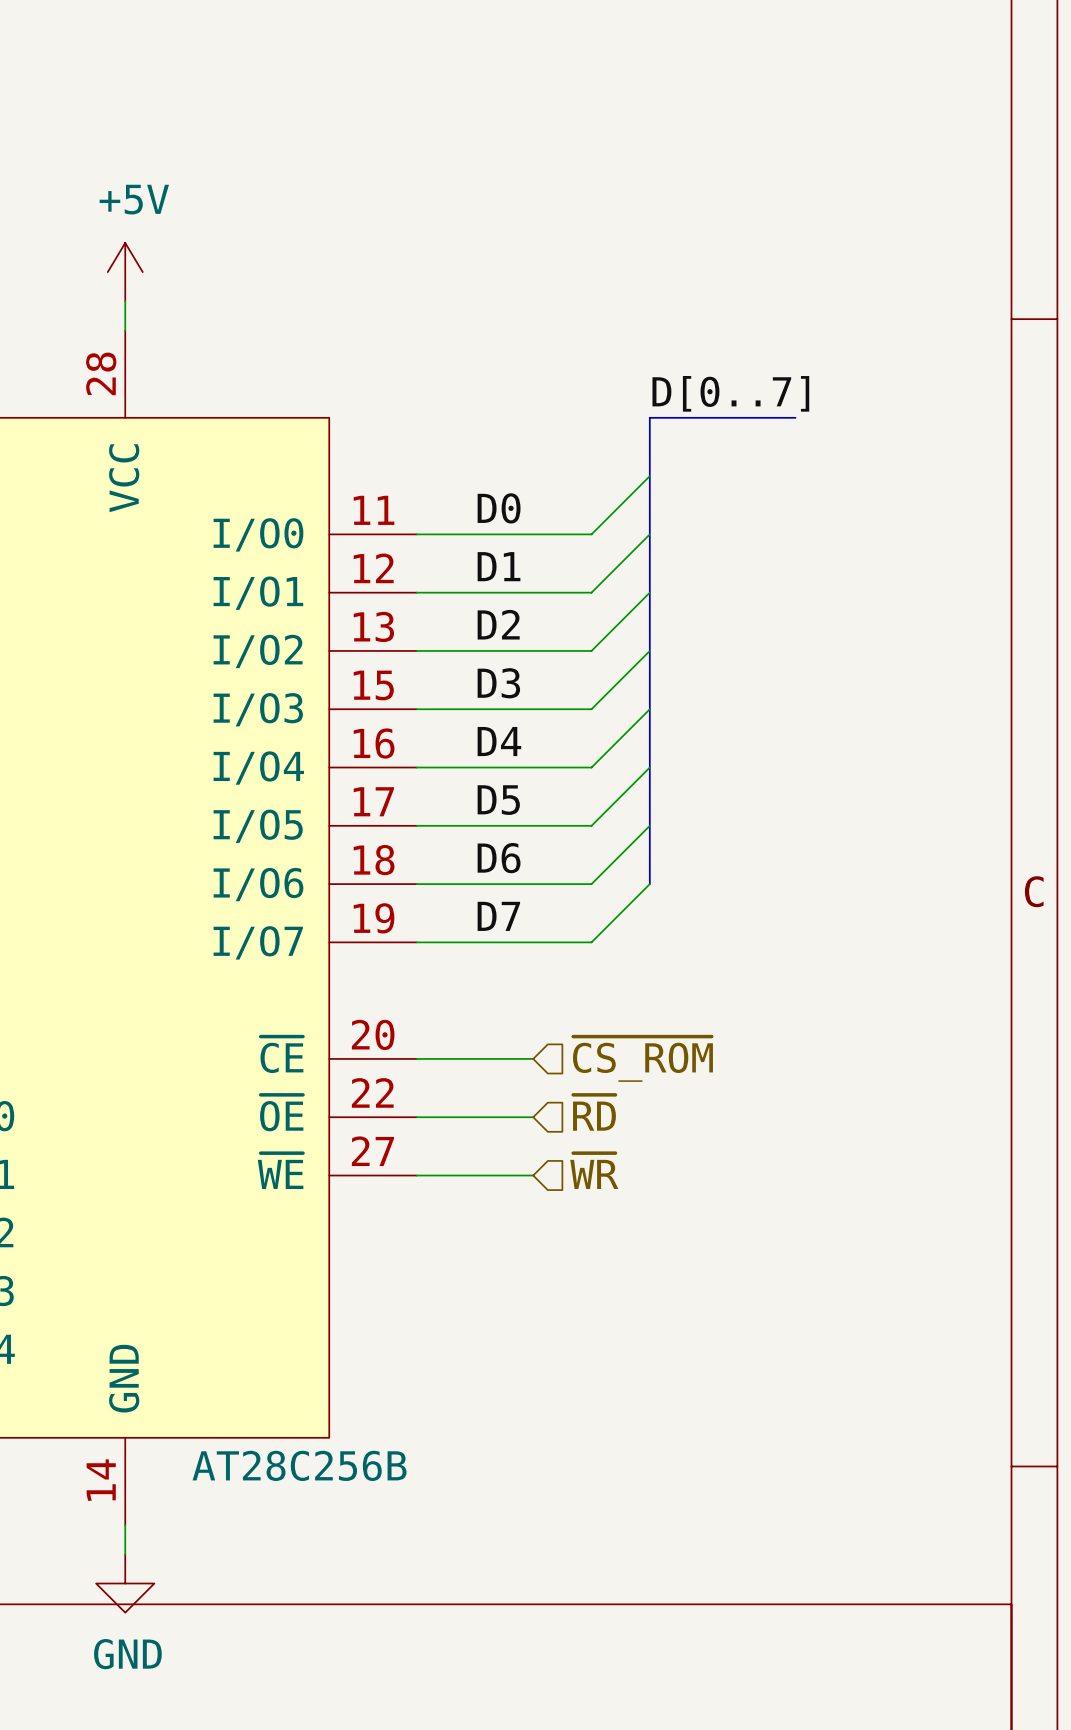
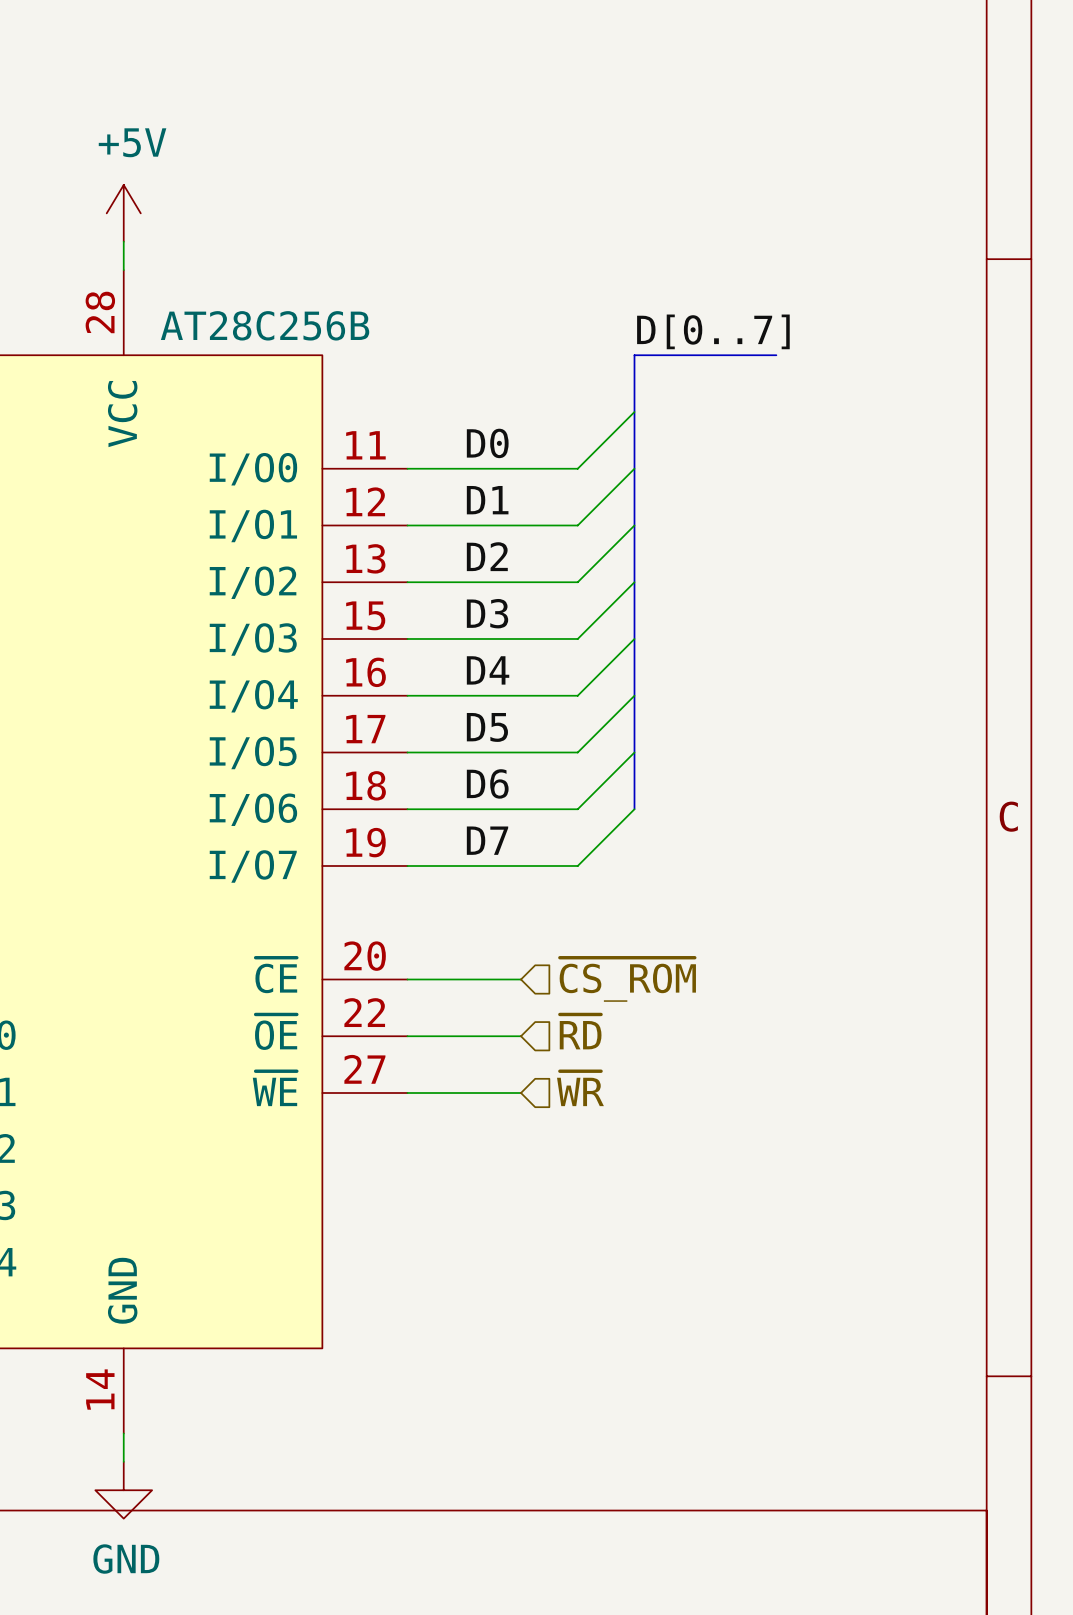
part value position: AT28C256B (299, 1465) -> AT28C256B (265, 325)

